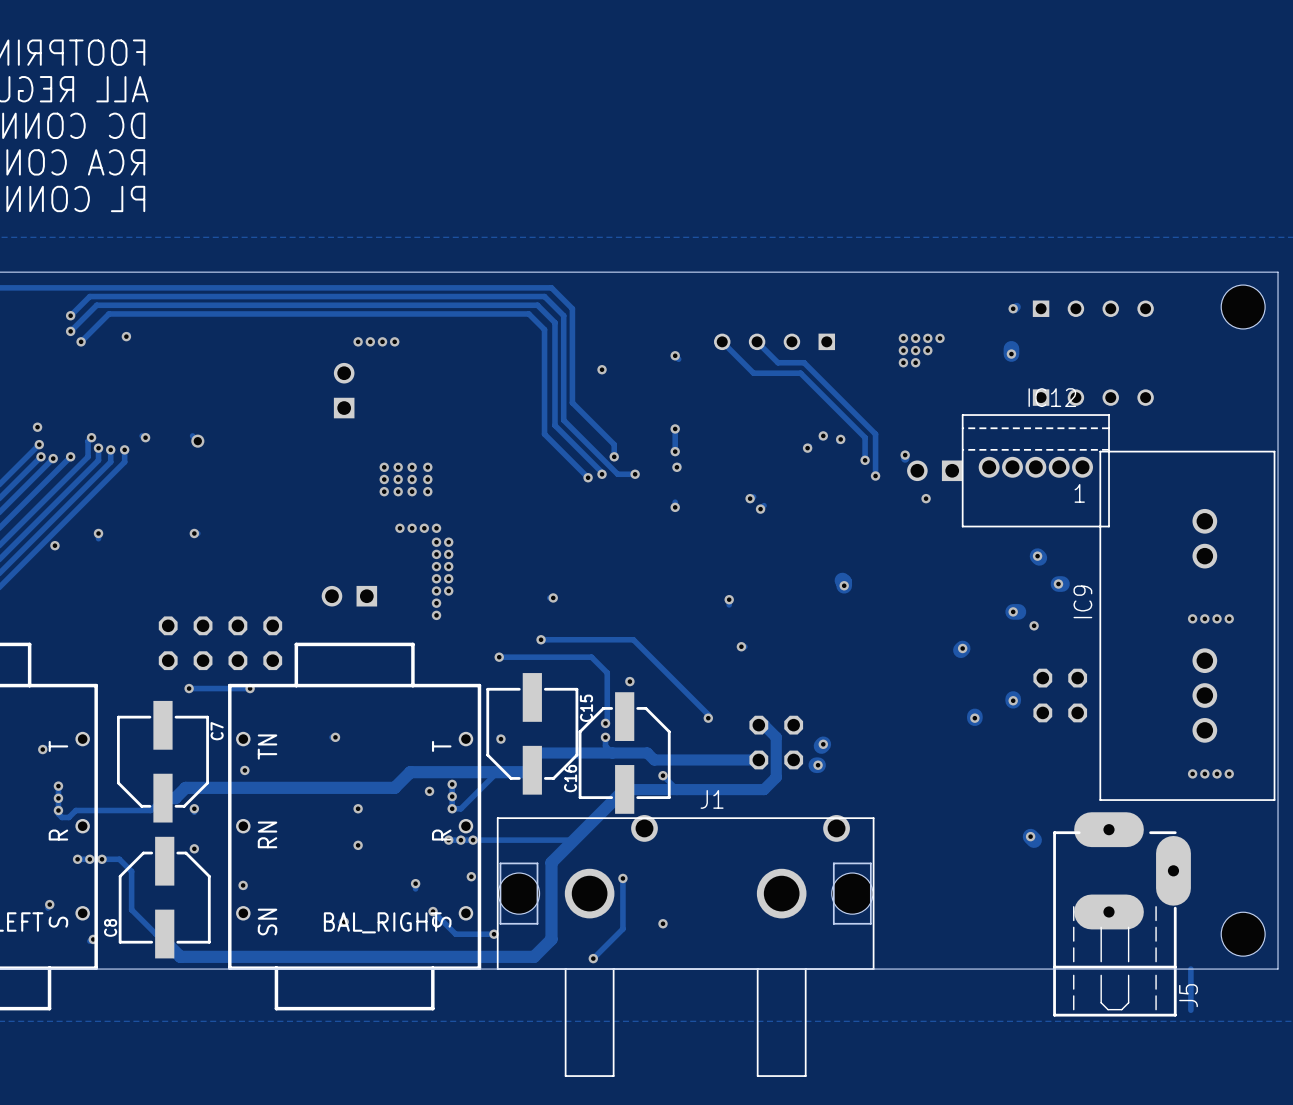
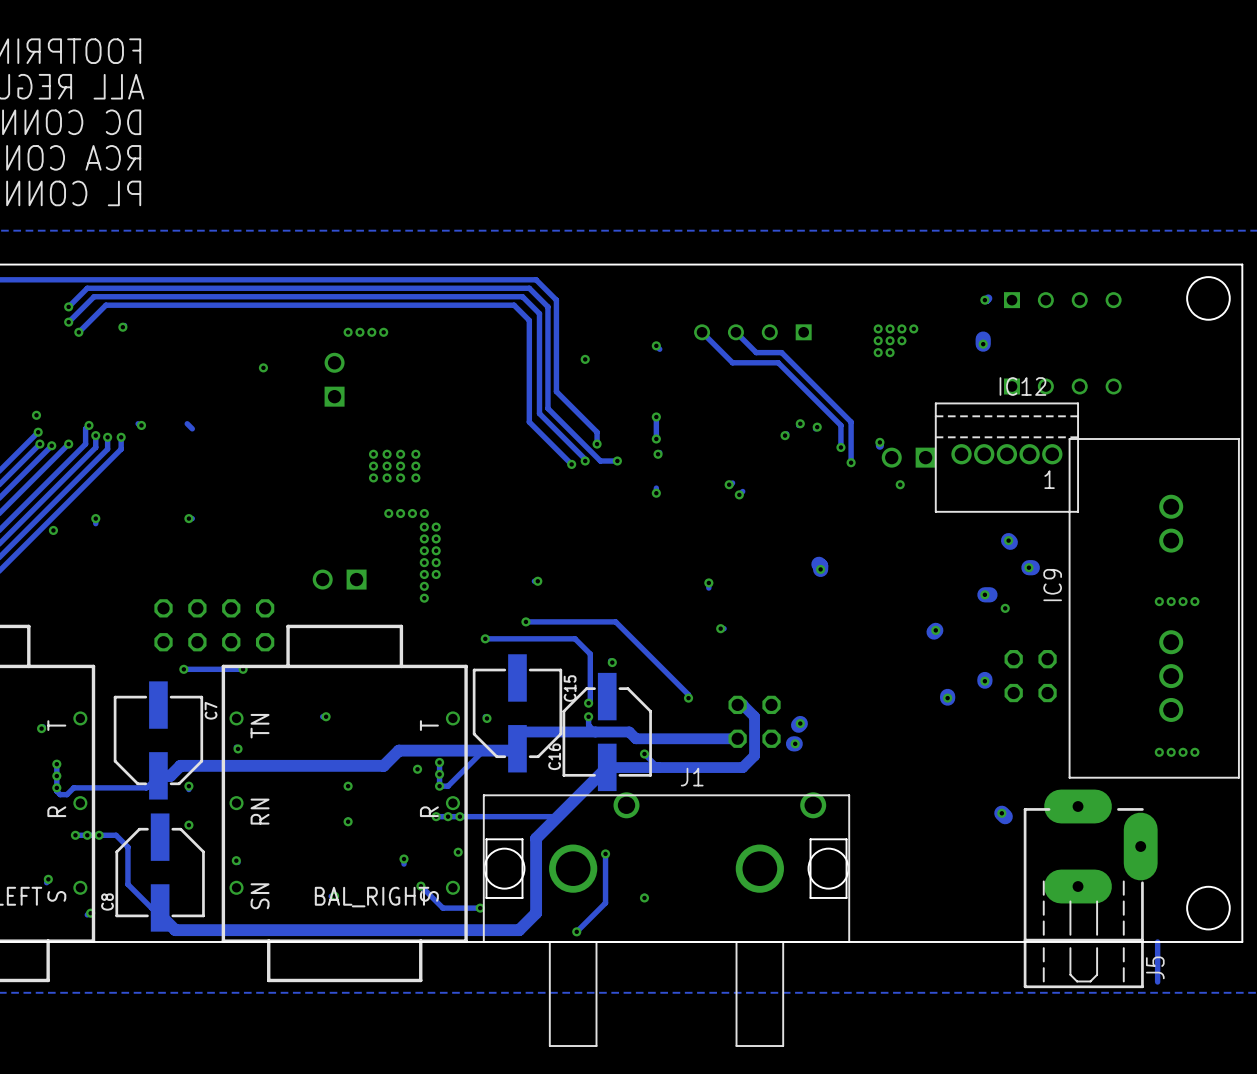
via: none -> (263, 367)
via: (197, 441) -> none

